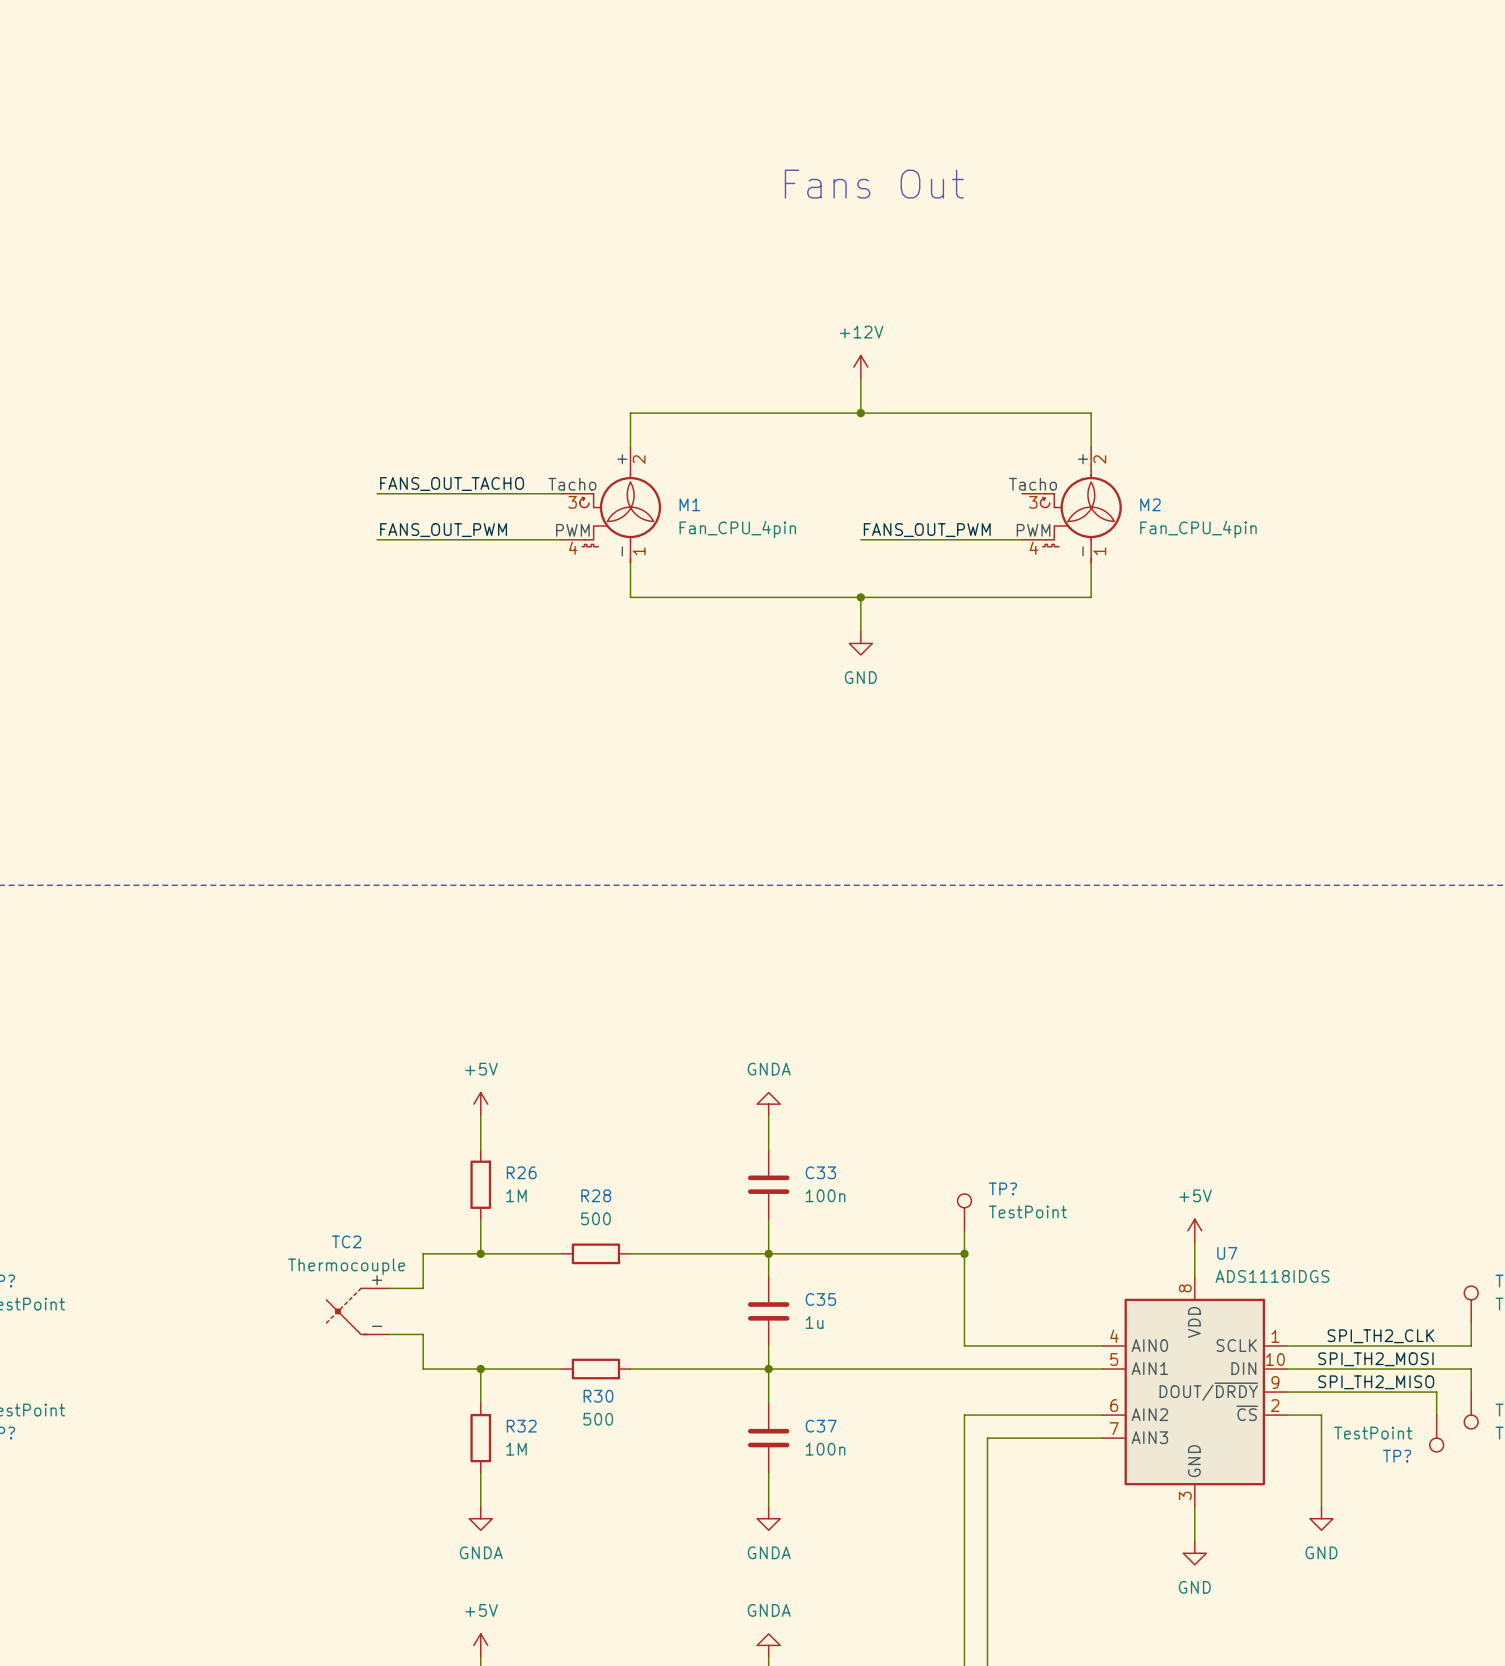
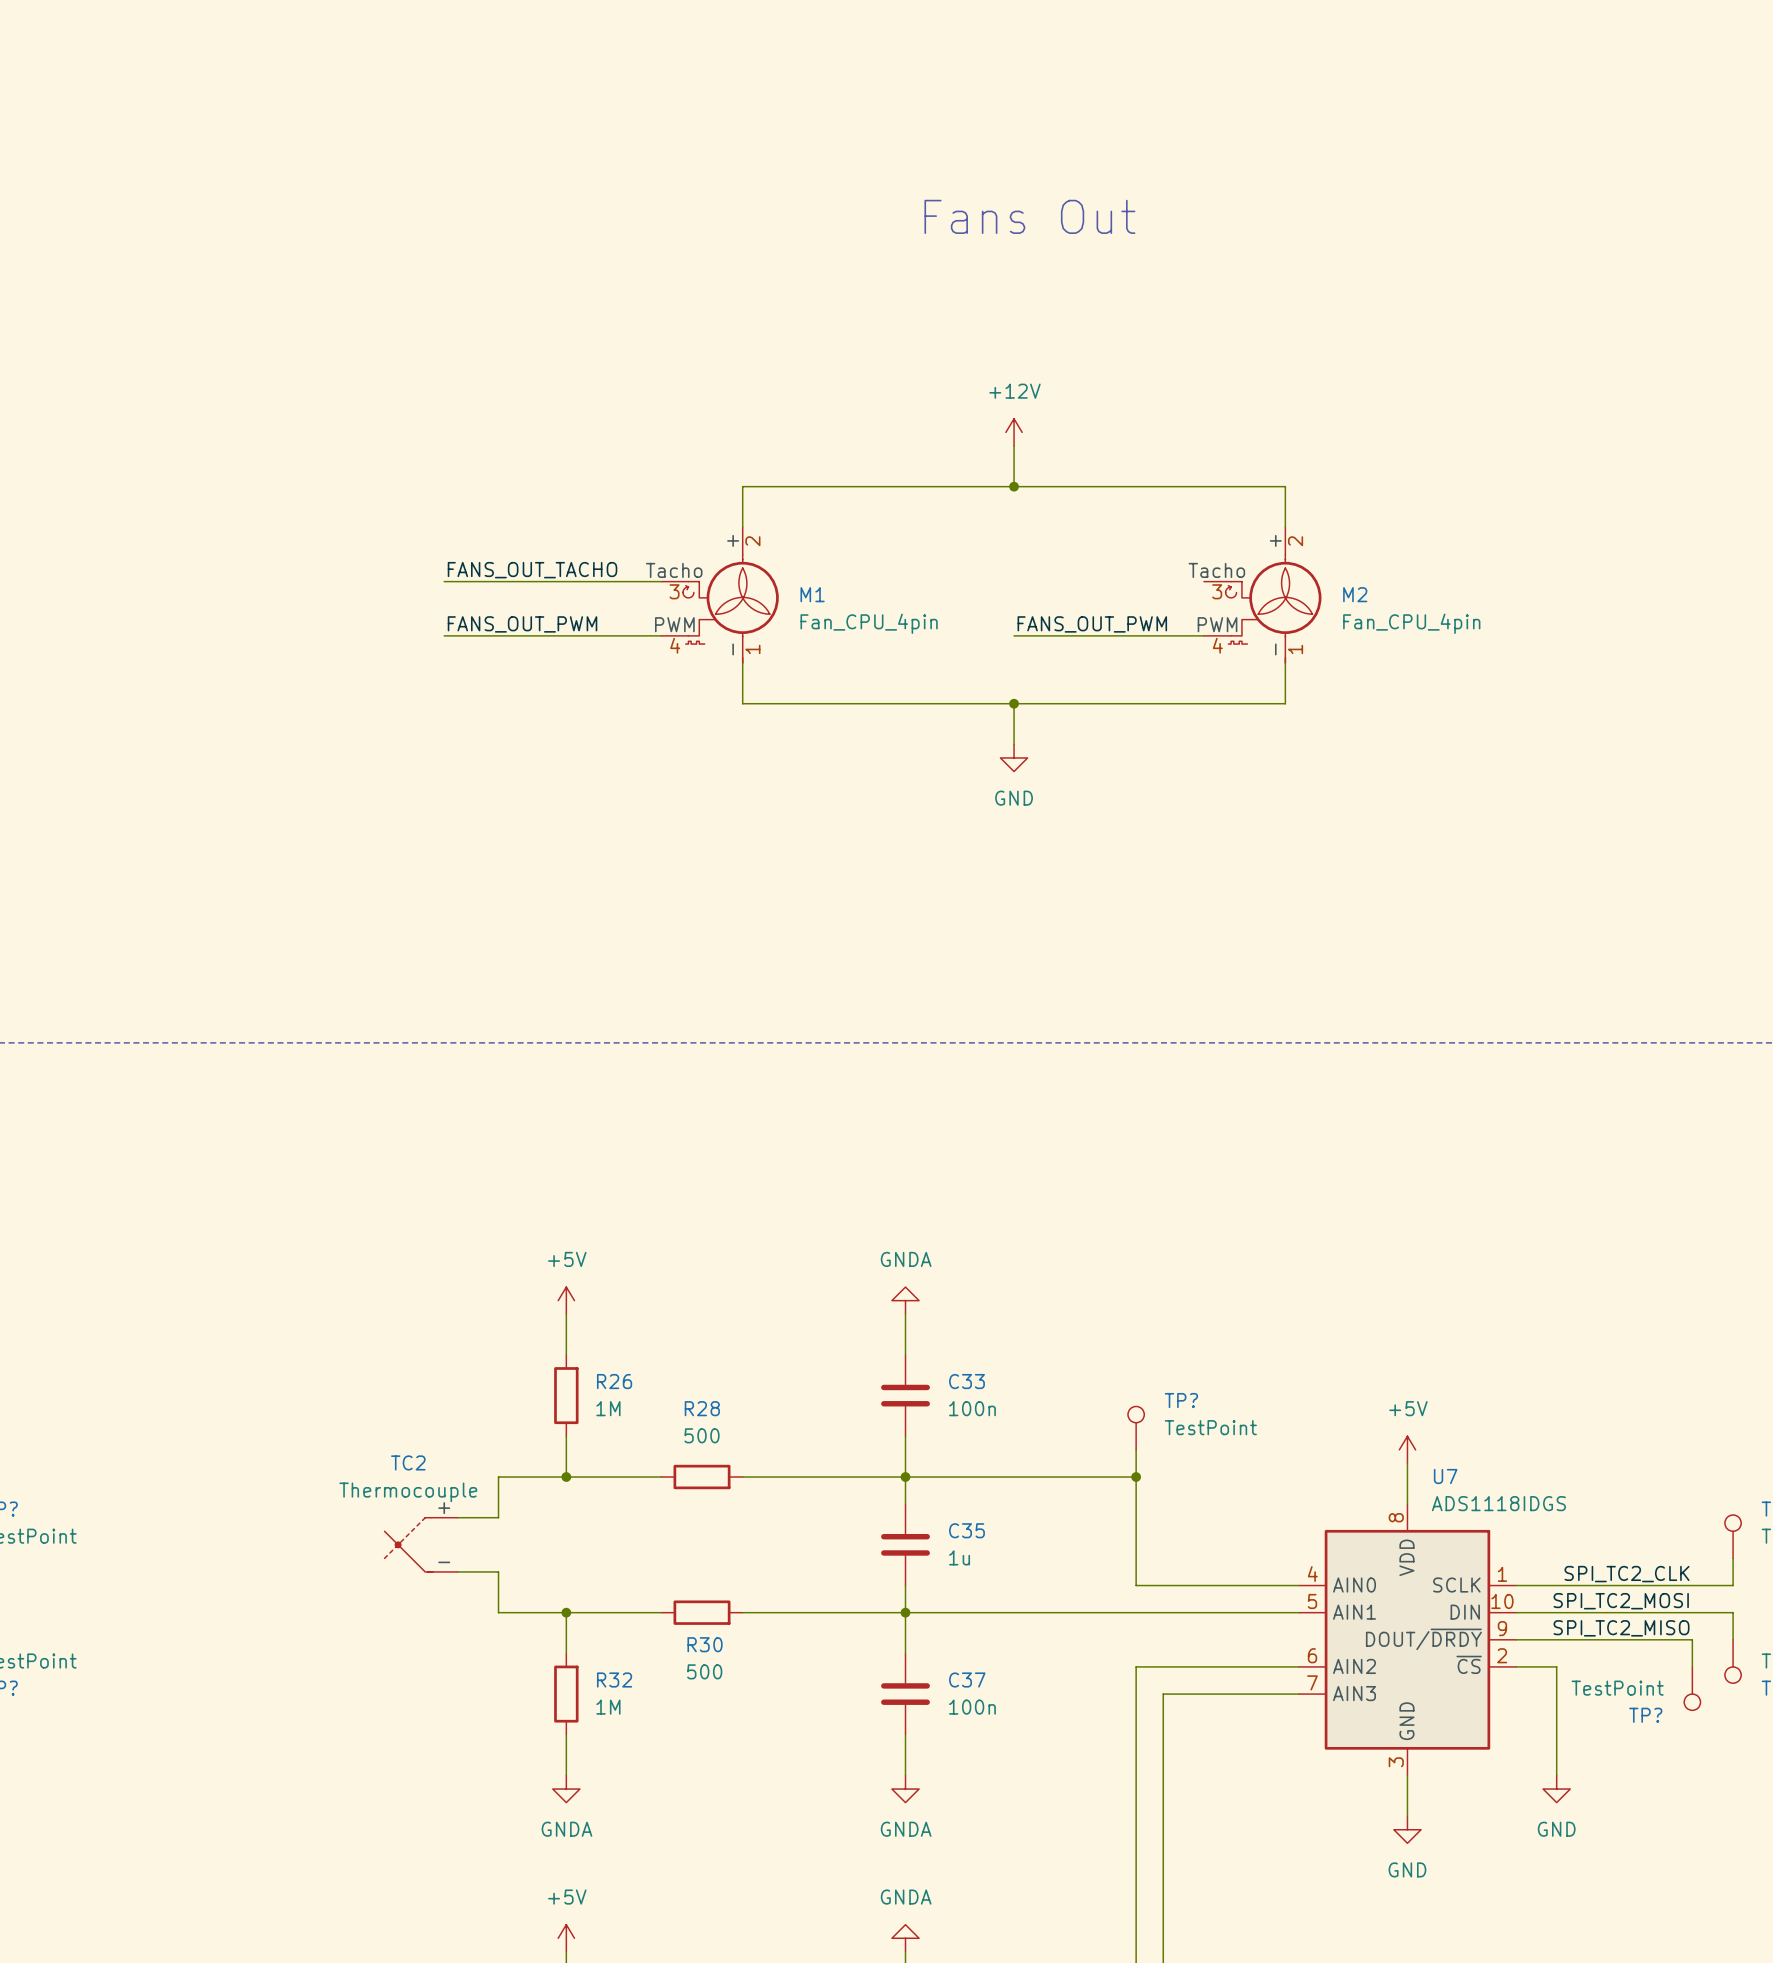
label: SPI_TH2_CLK (1380, 1336) -> SPI_TC2_CLK (1627, 1574)
label: SPI_TH2_MOSI (1375, 1359) -> SPI_TC2_MOSI (1621, 1601)
label: SPI_TH2_MISO (1376, 1382) -> SPI_TC2_MISO (1621, 1628)

